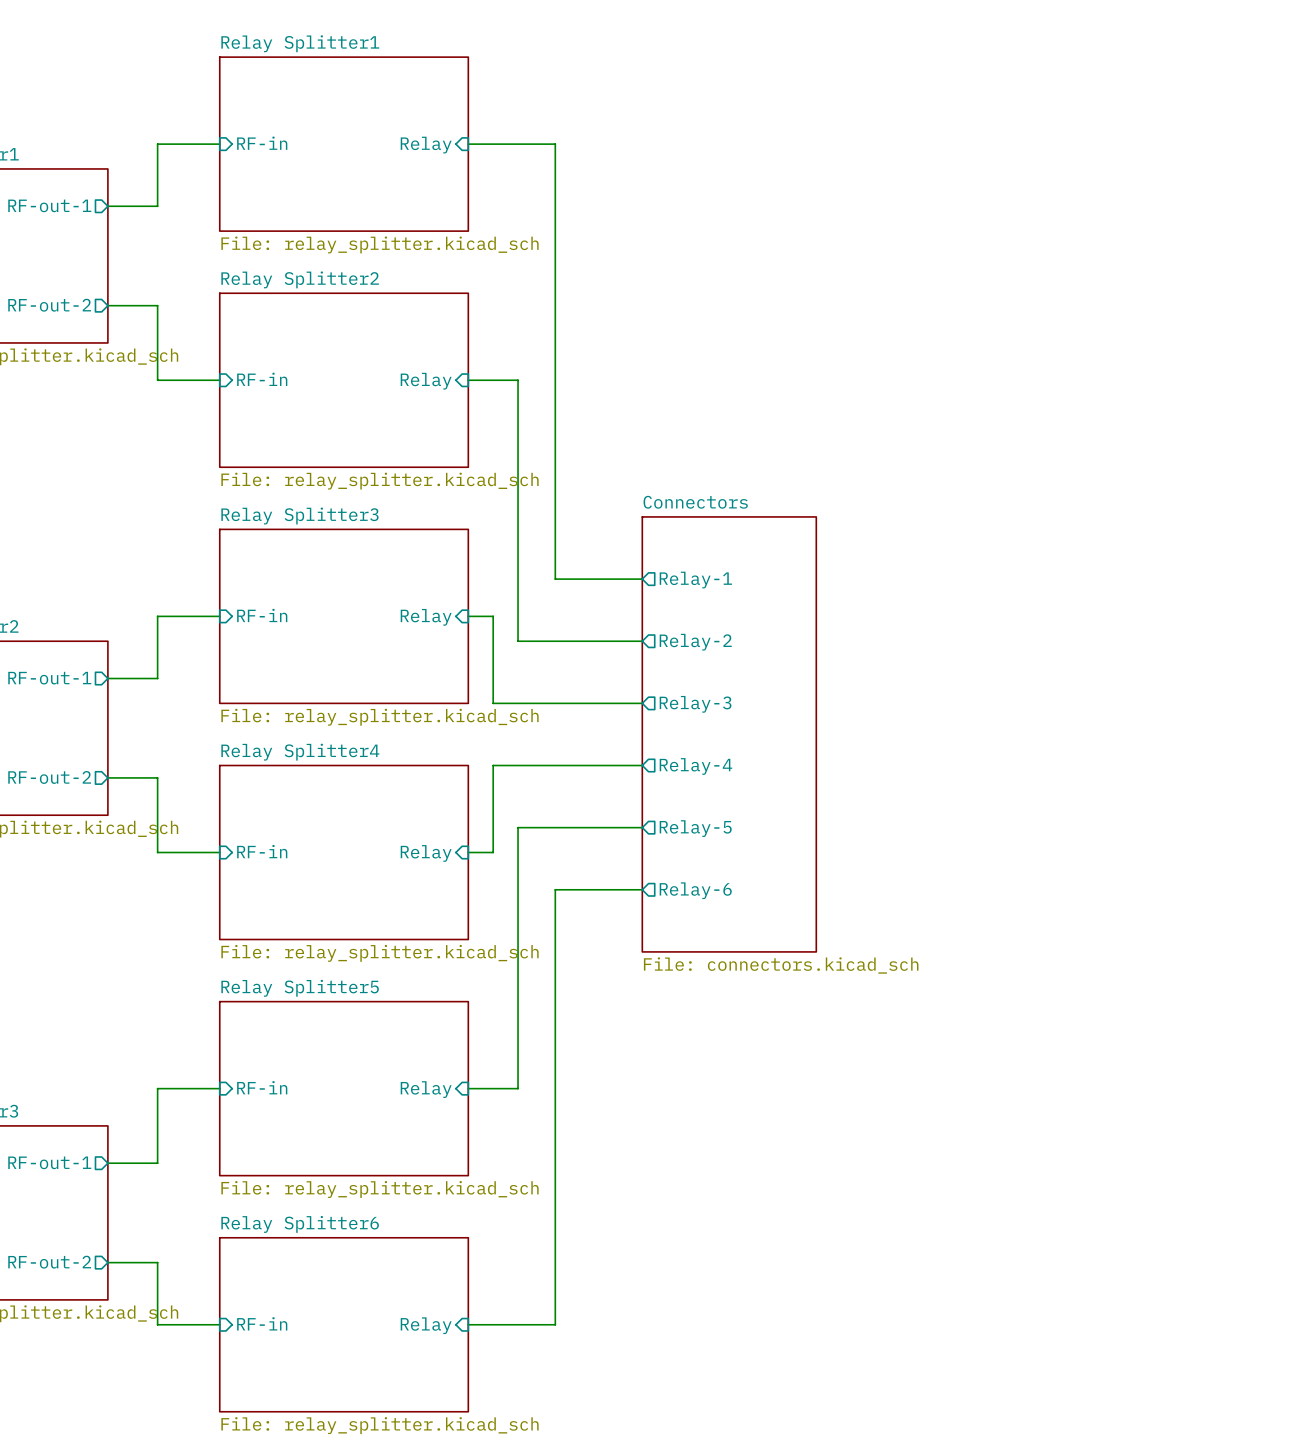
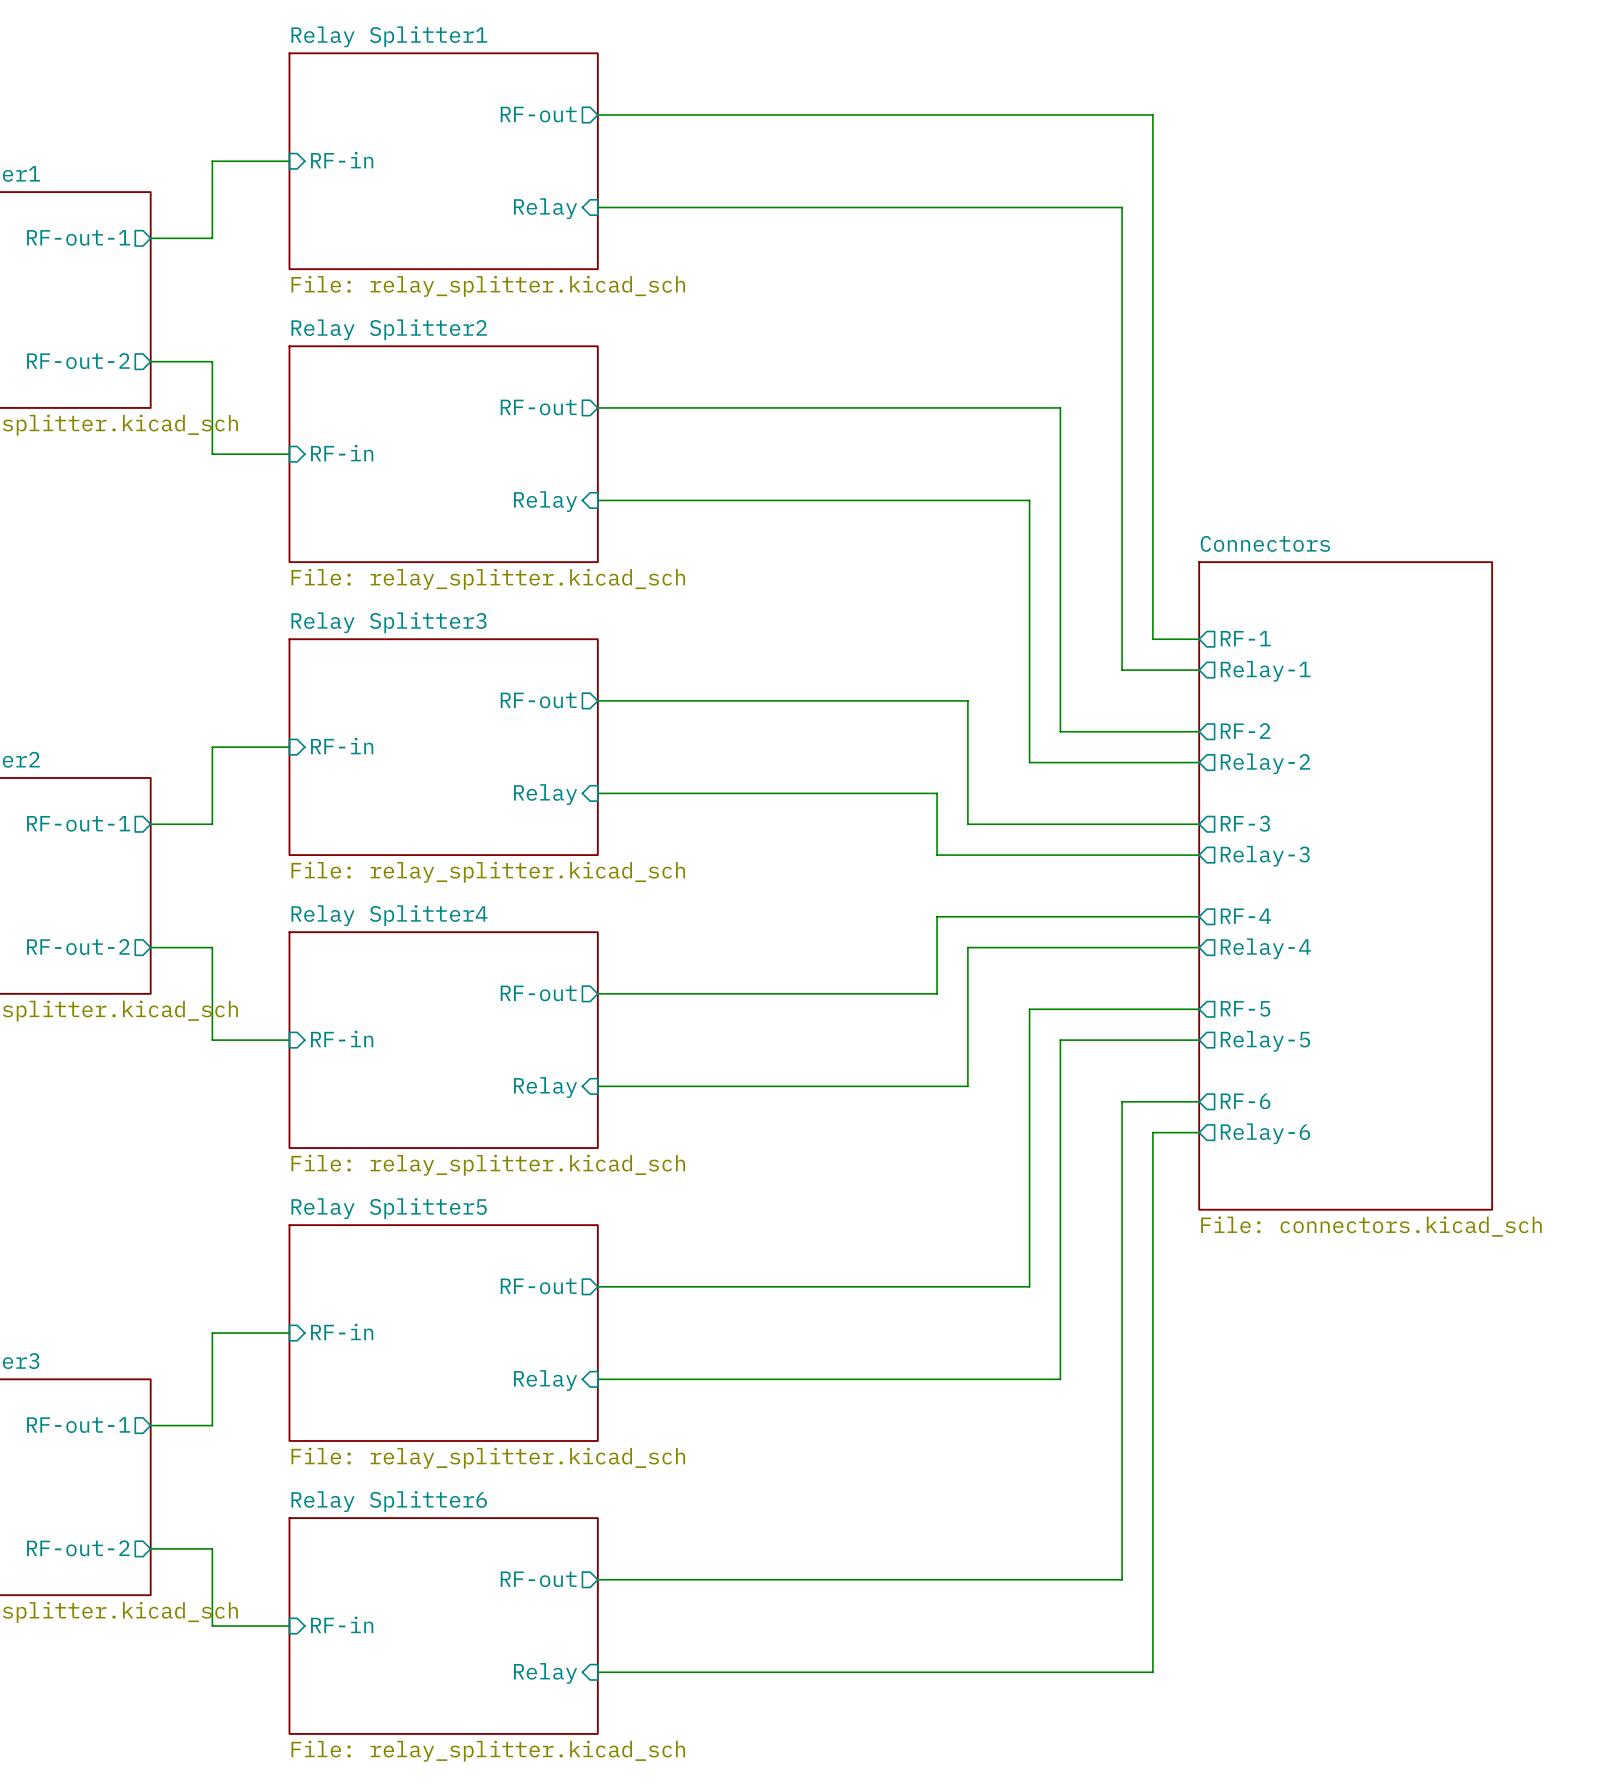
sheet pin: none -> RF-out (538, 114)
wire: none -> (597, 114) (1152, 114) (1152, 639) (1199, 639)
wire: (468, 144) (555, 144) (555, 579) -> (597, 700) (705, 700)
sheet pin position: Relay (426, 145) -> Relay (545, 208)
wire: none -> (597, 207) (1122, 207) (1122, 670) (1199, 670)
sheet pin: none -> RF-out (538, 407)
wire: none -> (597, 407) (1060, 407) (1060, 731) (1199, 731)
wire: (468, 380) (518, 380) (518, 641) (642, 641) -> none
sheet pin position: Relay (426, 381) -> Relay (545, 501)
wire: none -> (597, 500) (1029, 500) (1029, 762) (1199, 762)
sheet pin: none -> RF-1 (1245, 638)
sheet pin: none -> Relay-1 (1265, 671)
sheet pin: none -> RF-out (538, 700)
wire: none -> (813, 700) (967, 700) (967, 824) (1199, 824)
sheet pin: Relay-1 (695, 580) -> none
sheet pin: none -> RF-2 (1245, 731)
wire: (468, 616) (493, 616) (493, 703) (642, 703) -> none
sheet pin position: Relay (426, 617) -> Relay (545, 794)
sheet pin: none -> Relay-2 (1265, 763)
sheet pin: Relay-2 (695, 642) -> none
wire: none -> (597, 793) (937, 793) (937, 855) (1199, 855)
sheet pin: none -> RF-3 (1245, 823)
sheet pin: Relay-3 (695, 704) -> none
sheet pin: none -> Relay-3 (1265, 856)
sheet Connectors: none -> File: connectors.kicad_sch (1345, 885)
sheet Connectors: File: connectors.kicad_sch (729, 734) -> none
sheet pin: none -> RF-4 (1245, 916)
wire: none -> (1199, 916) (937, 916) (937, 993) (597, 993)
wire: (642, 765) (493, 765) (493, 852) (468, 852) -> none
sheet pin: Relay-4 (695, 766) -> none
wire: none -> (1199, 947) (967, 947) (967, 1086) (813, 1086)
sheet pin: none -> Relay-4 (1265, 948)
sheet pin: none -> RF-out (538, 993)
wire: (642, 827) (518, 827) (518, 1088) (468, 1088) -> none
wire: none -> (1199, 1009) (1029, 1009) (1029, 1286) (597, 1286)
sheet pin: none -> RF-5 (1245, 1008)
sheet pin: Relay-5 (695, 828) -> none
wire: none -> (1199, 1040) (1060, 1040) (1060, 1379) (597, 1379)
sheet pin position: Relay (426, 853) -> Relay (545, 1087)
sheet pin: none -> Relay-5 (1265, 1041)
wire: (555, 889) (555, 1324) (468, 1324) -> (705, 1086) (597, 1086)
sheet pin: Relay-6 (695, 890) -> none
sheet pin: none -> RF-6 (1245, 1101)
wire: none -> (1199, 1101) (1122, 1101) (1122, 1579) (597, 1579)
wire: none -> (1199, 1132) (1152, 1132) (1152, 1672) (597, 1672)
sheet pin: none -> Relay-6 (1265, 1133)
sheet pin: none -> RF-out (538, 1286)
sheet pin position: Relay (426, 1089) -> Relay (545, 1380)
sheet pin: none -> RF-out (538, 1579)
sheet pin position: Relay (426, 1325) -> Relay (545, 1673)

